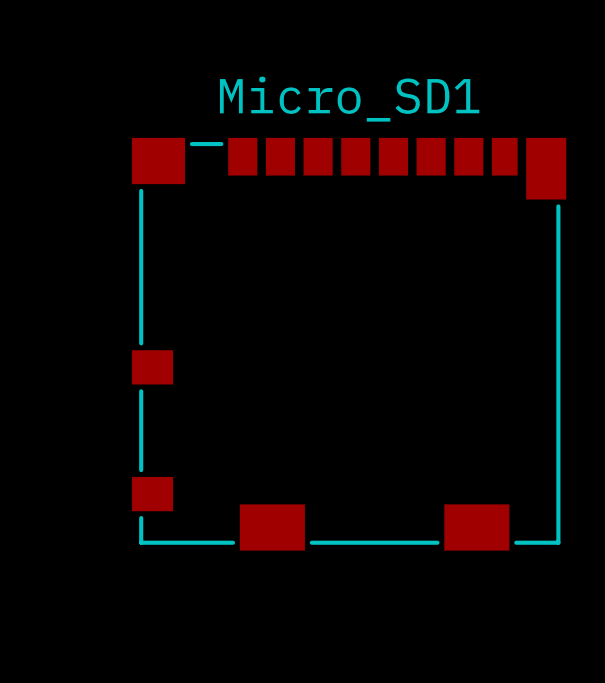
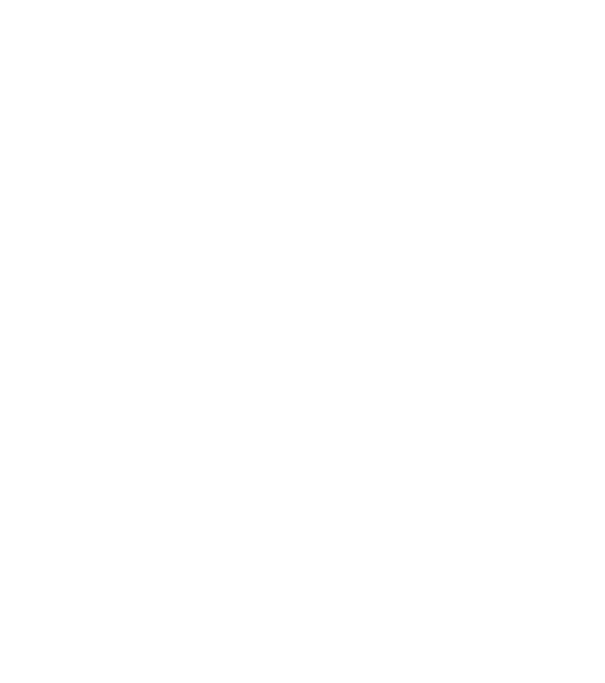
Micro_SD1: (349, 344) -> none

